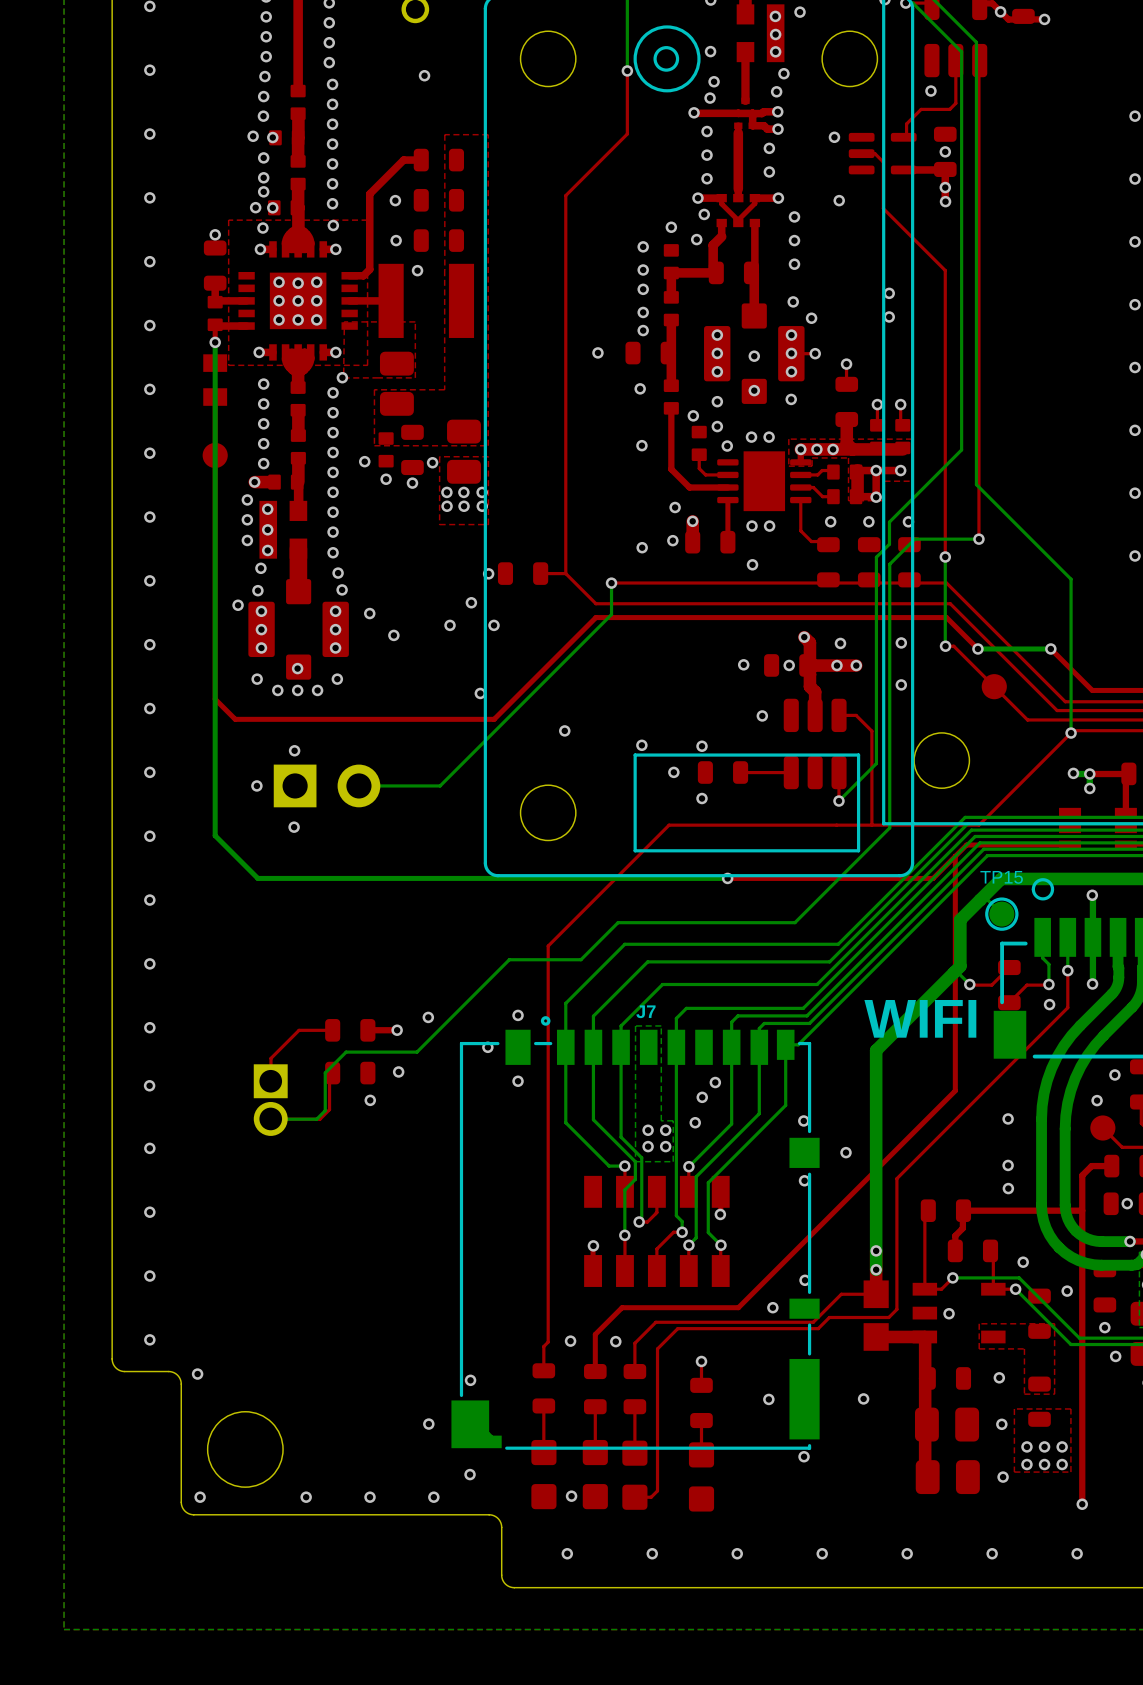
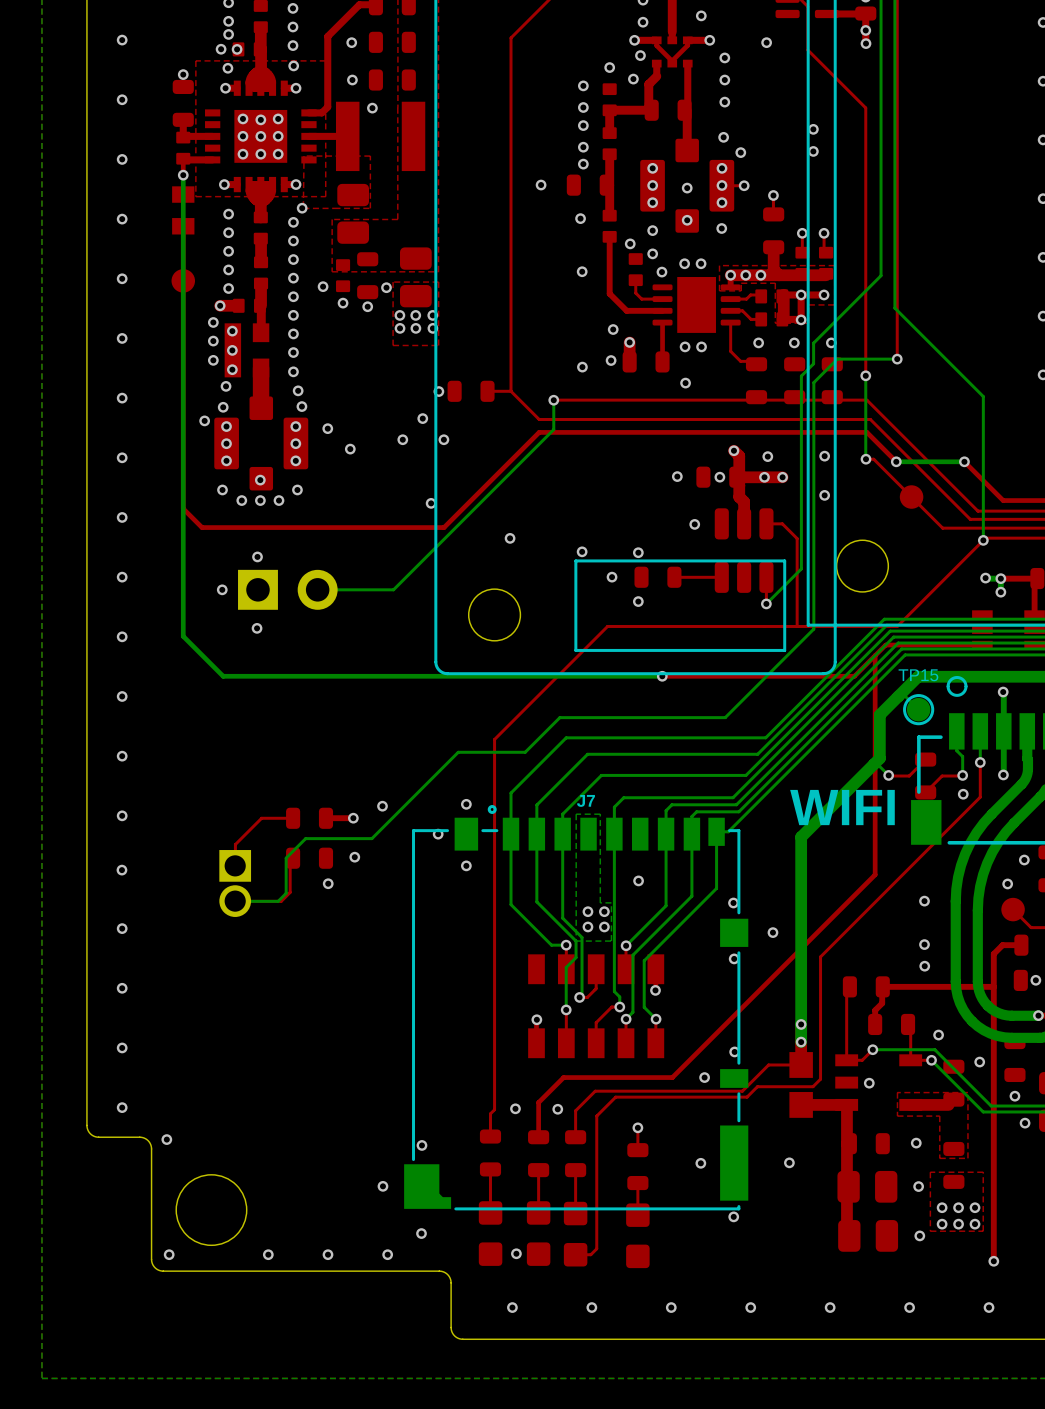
via: (715, 1082) -> none
via: (695, 1122) -> none
top track: none -> (948, 1104) (910, 1104)

